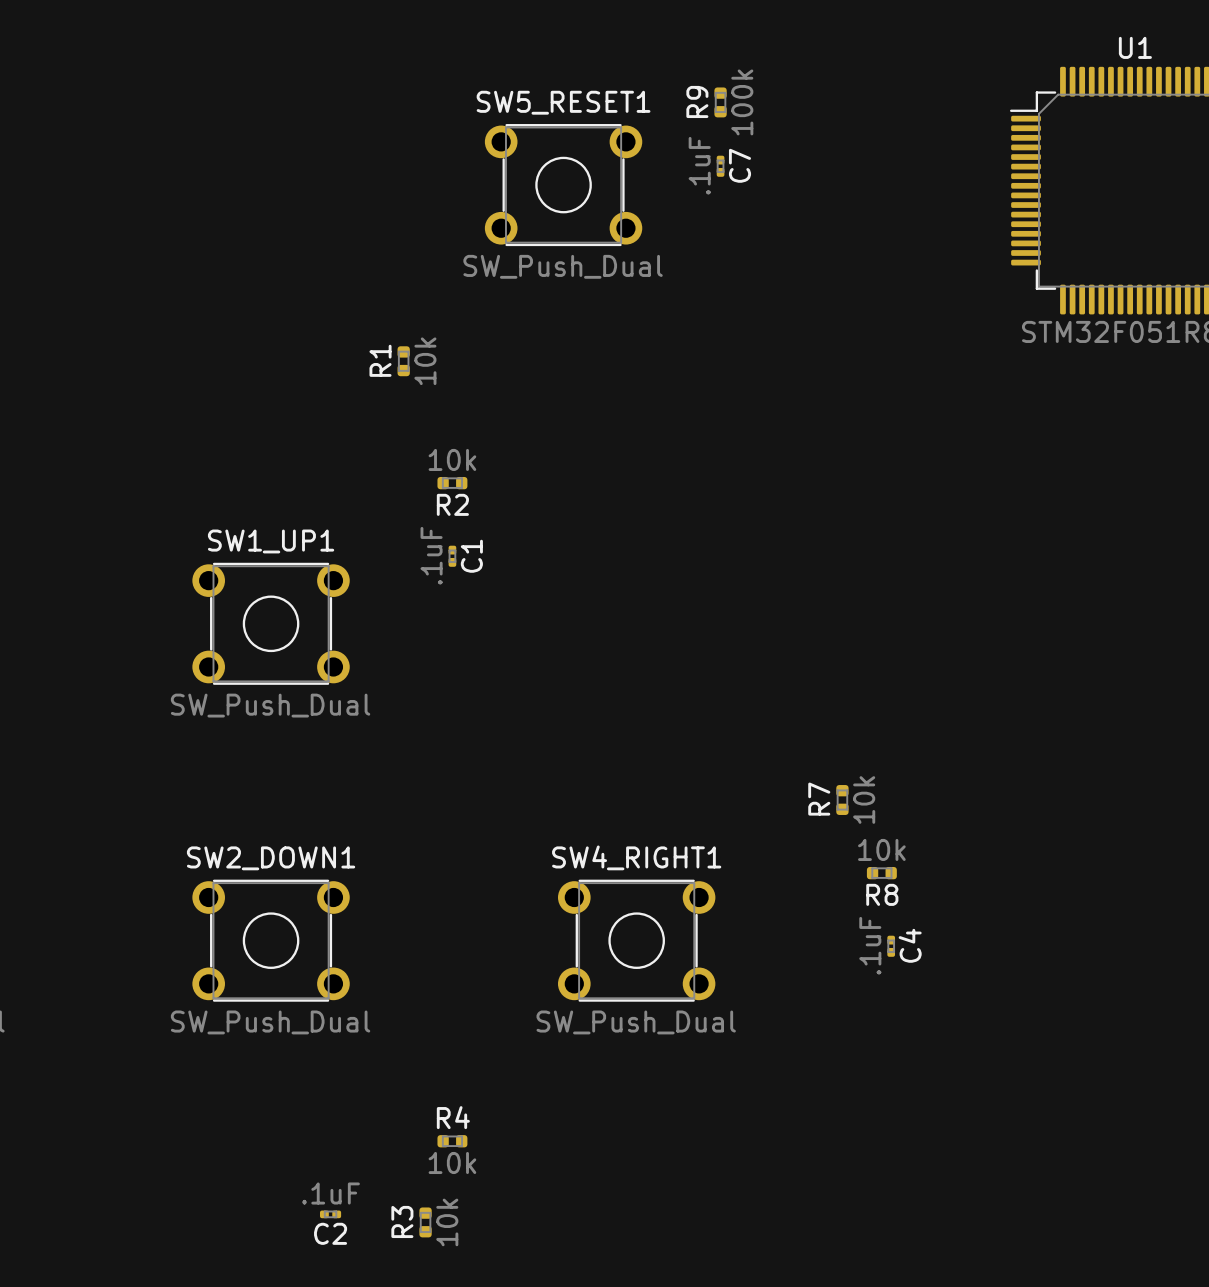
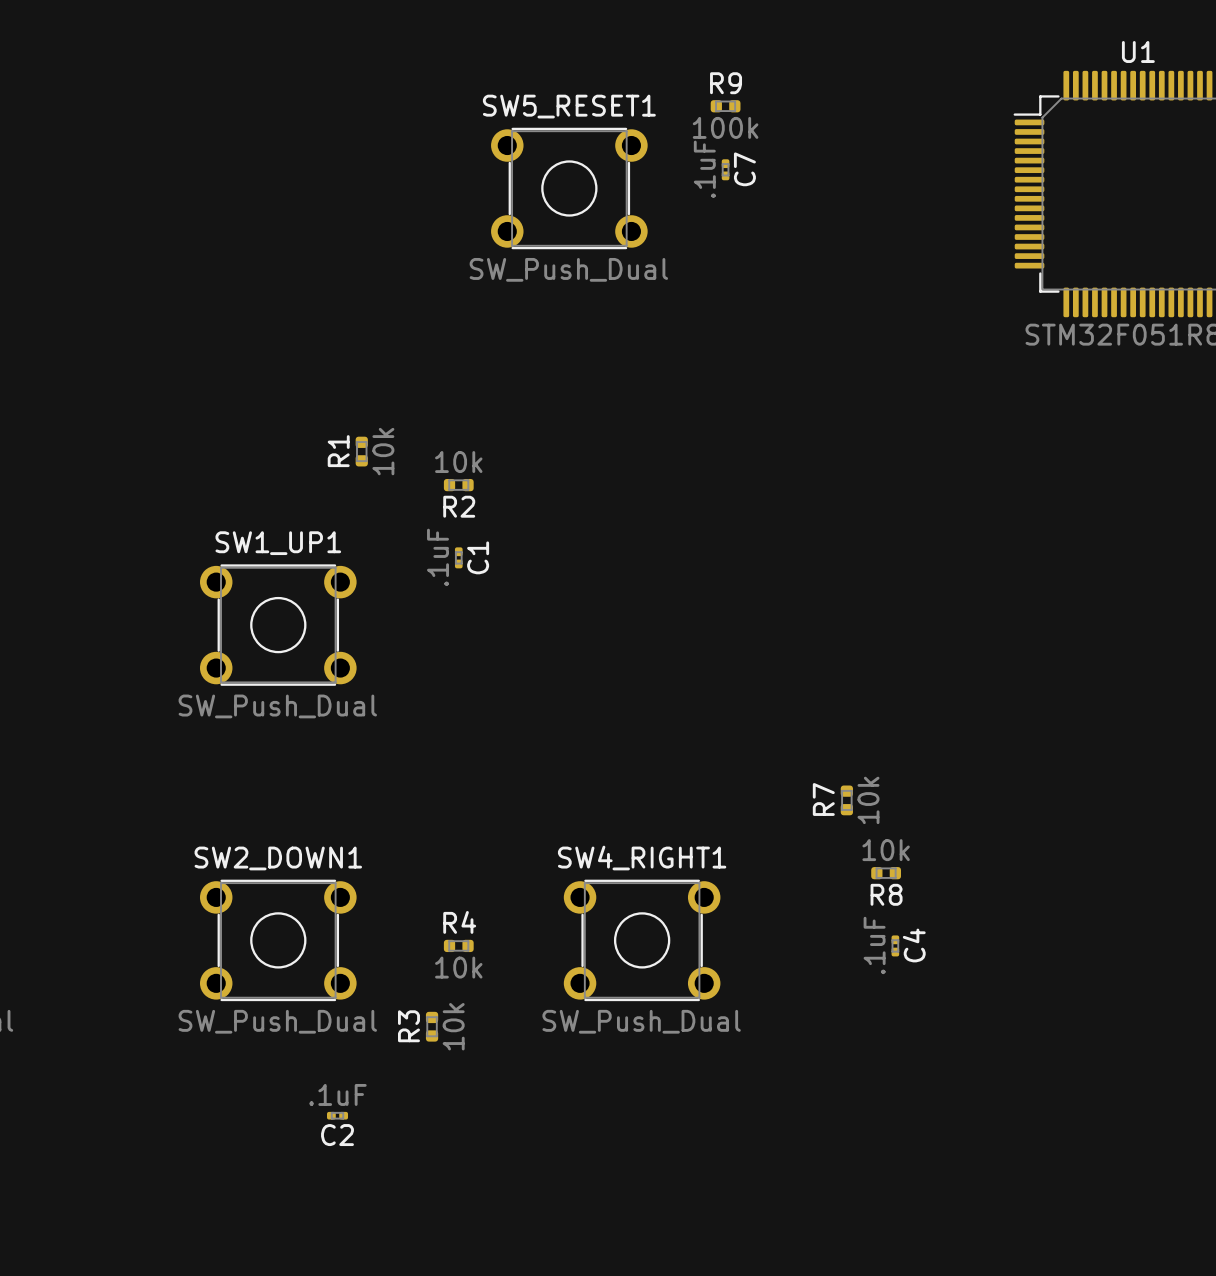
R9 rotation: 0° (720, 102) -> 90° clockwise (725, 106)
R1 position: (403, 361) -> (361, 451)
R4 position: (452, 1141) -> (458, 945)
C2 position: (330, 1214) -> (337, 1115)
R3 position: (425, 1222) -> (432, 1026)

